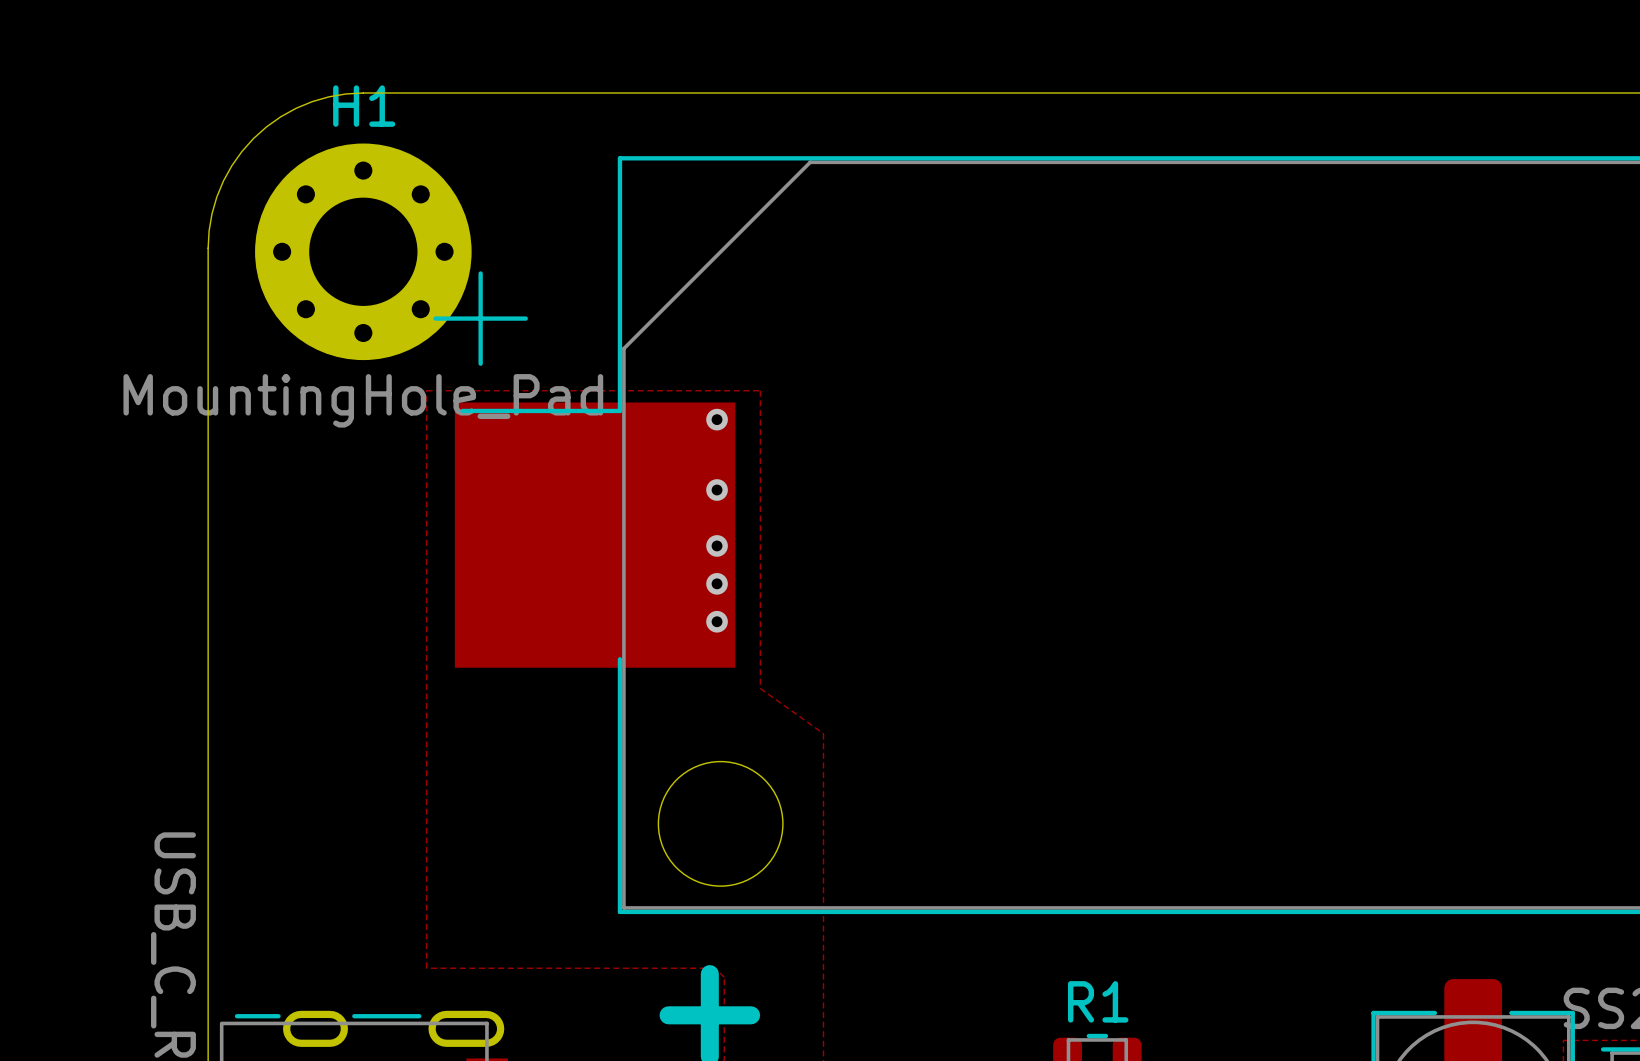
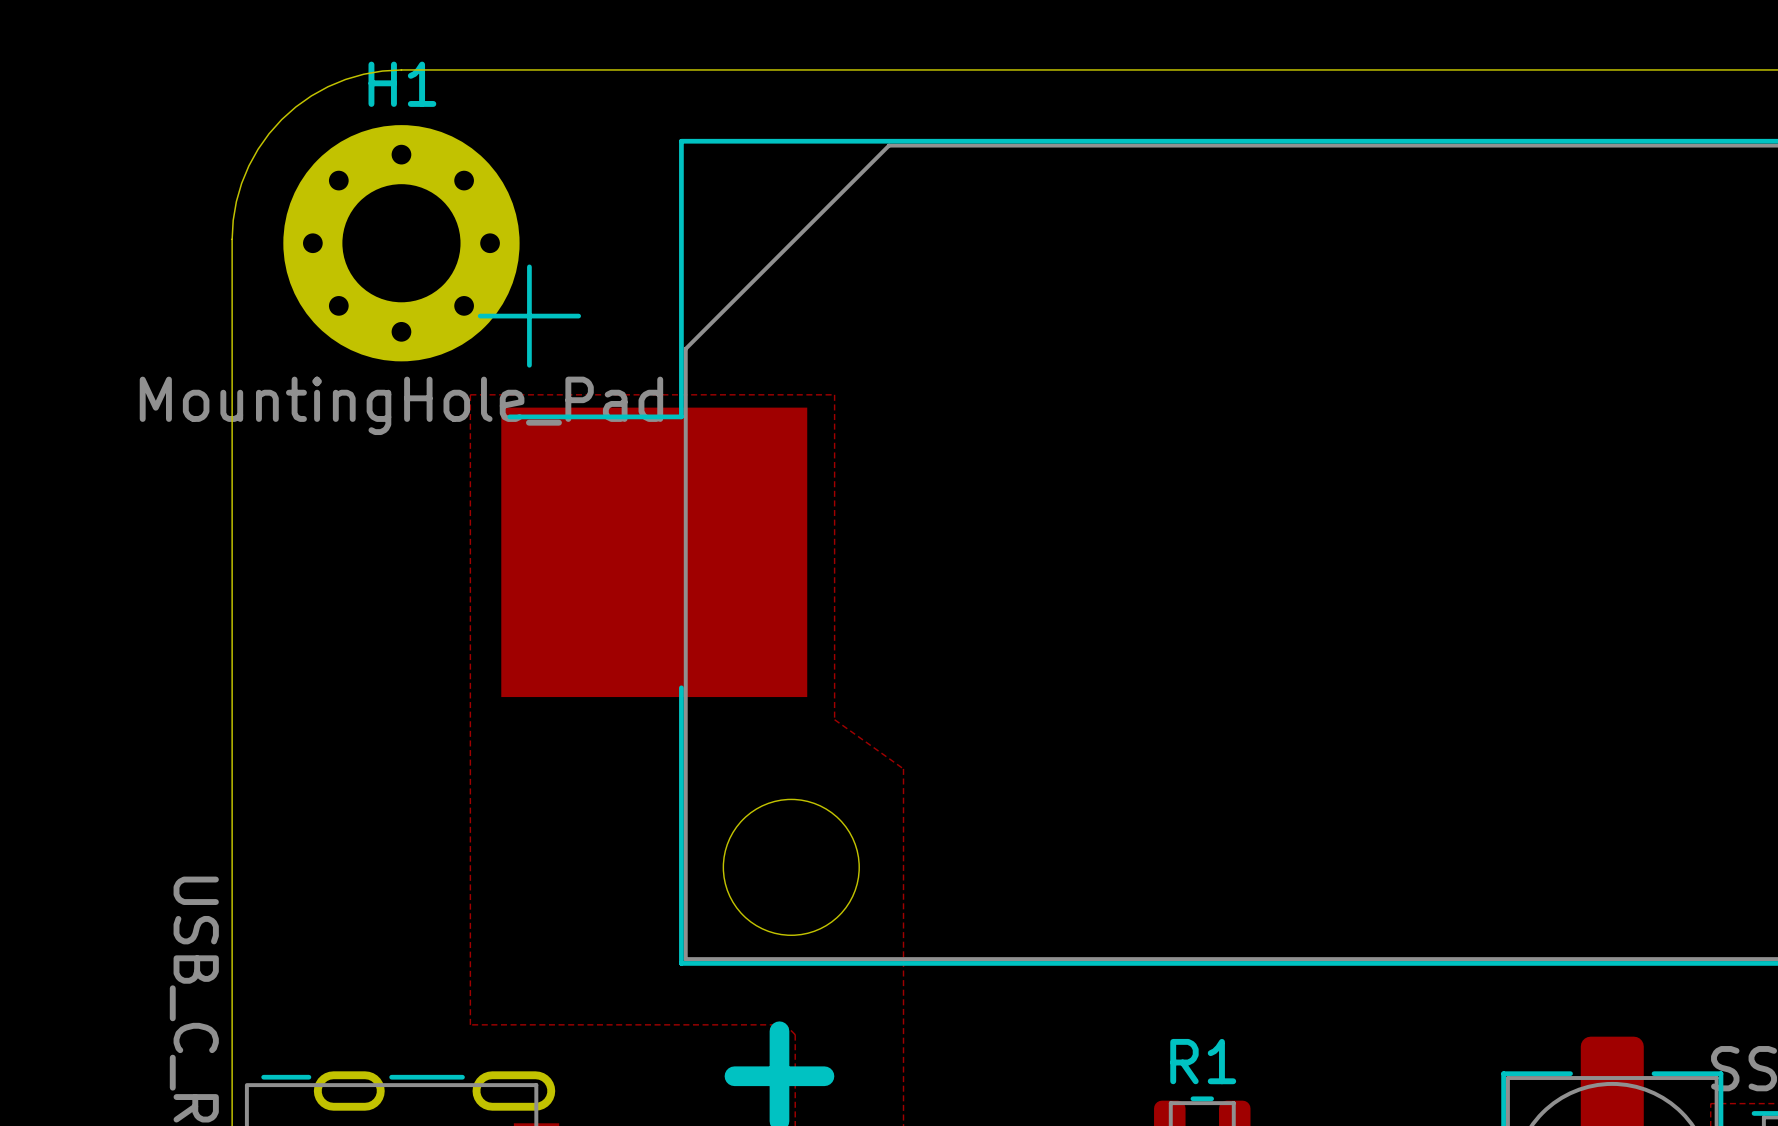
via: (717, 419) -> none
via: (717, 490) -> none
via: (717, 545) -> none
via: (717, 583) -> none
via: (717, 621) -> none

